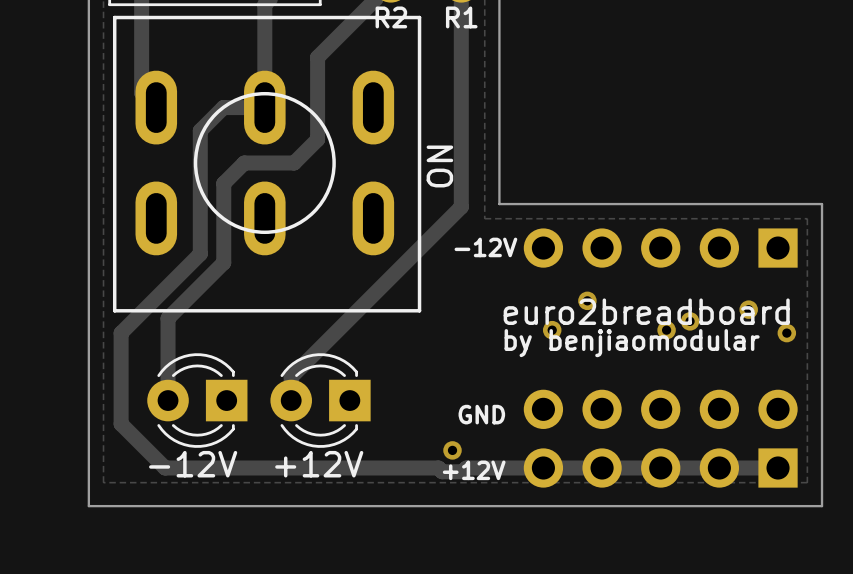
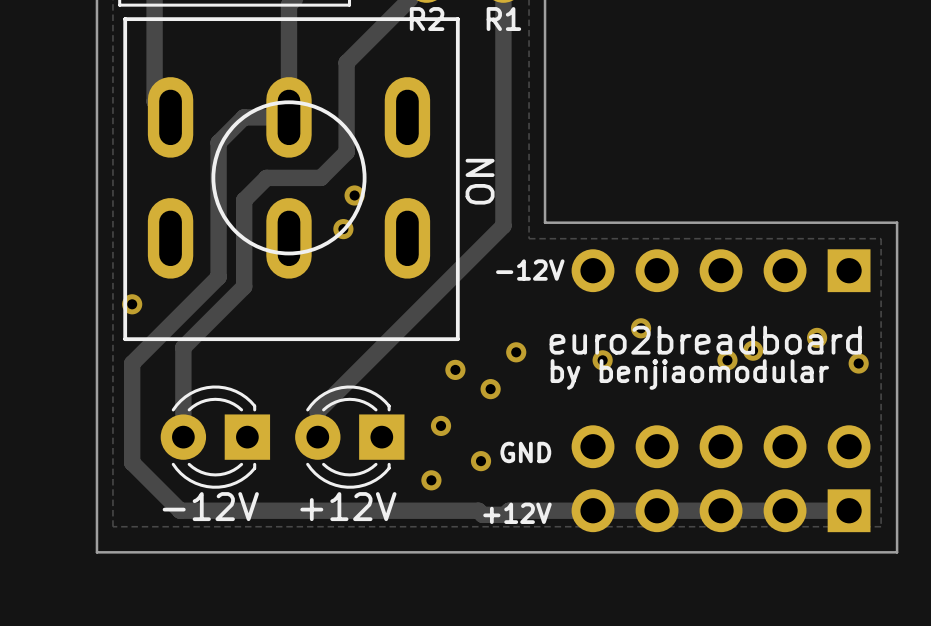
via: none -> (354, 195)
via: none -> (343, 229)
via: none -> (132, 304)
via: none -> (516, 352)
via: none -> (455, 369)
via: none -> (490, 389)
via: none -> (441, 425)
via: none -> (481, 461)
via: none -> (431, 480)
via: (452, 450) -> none

